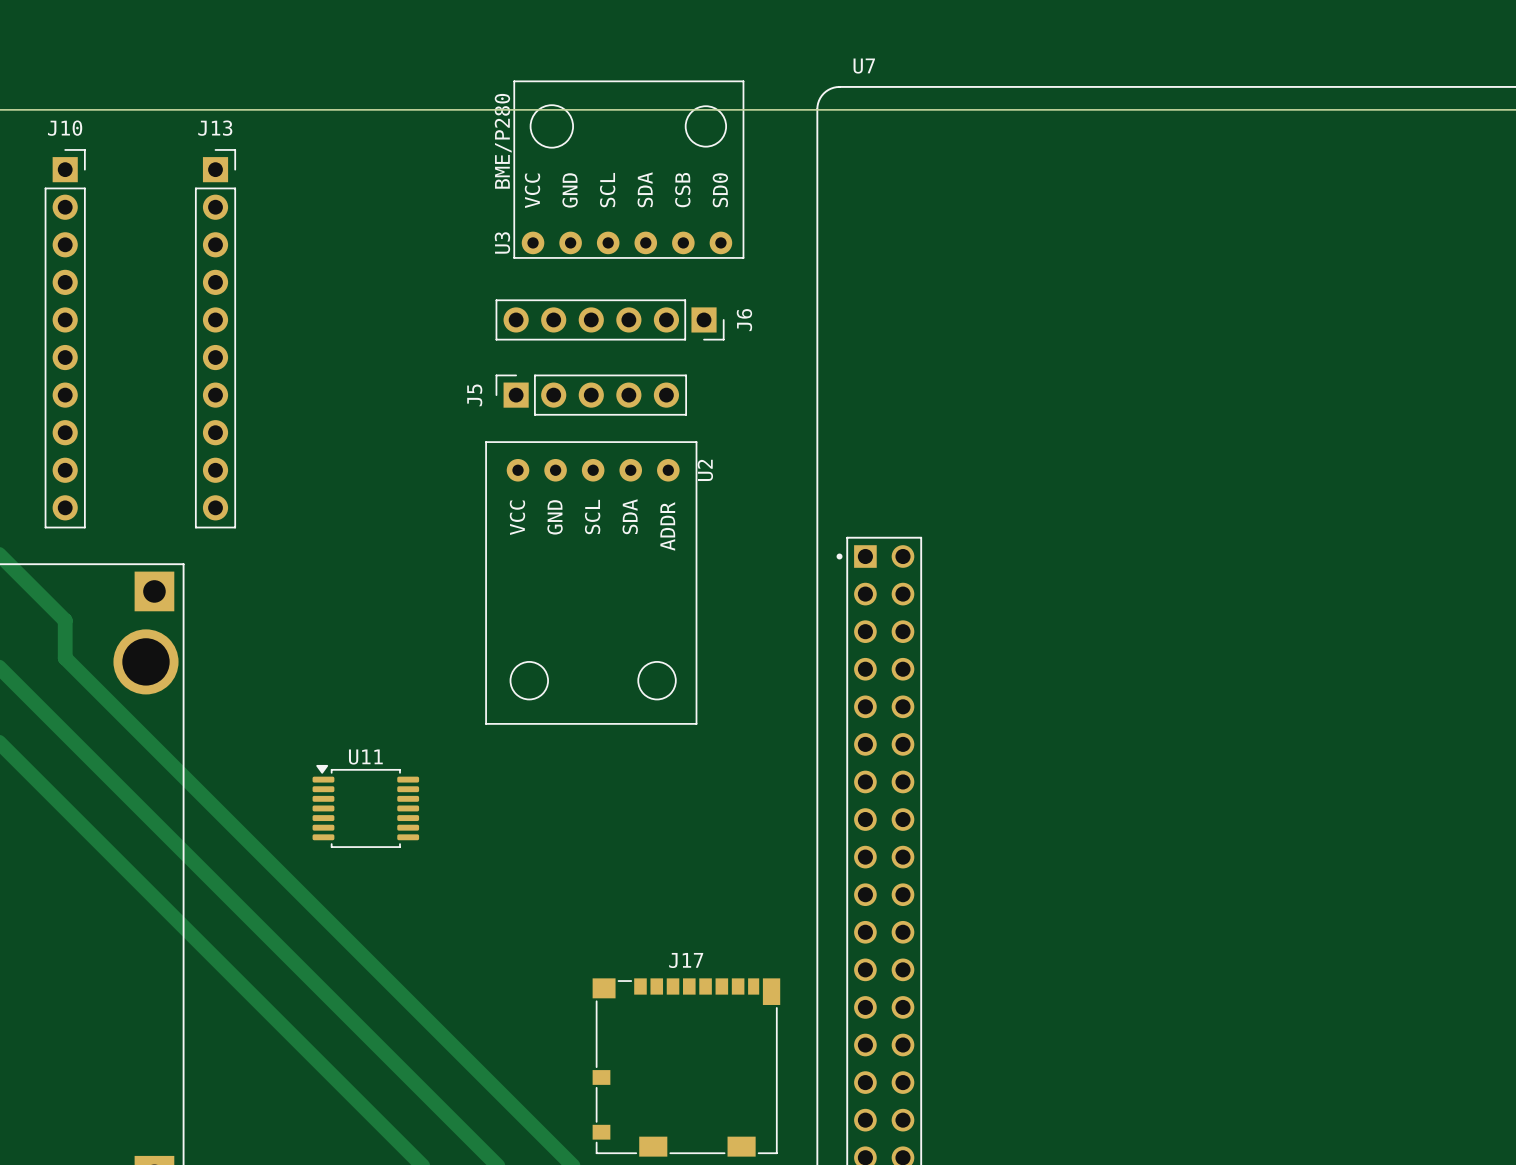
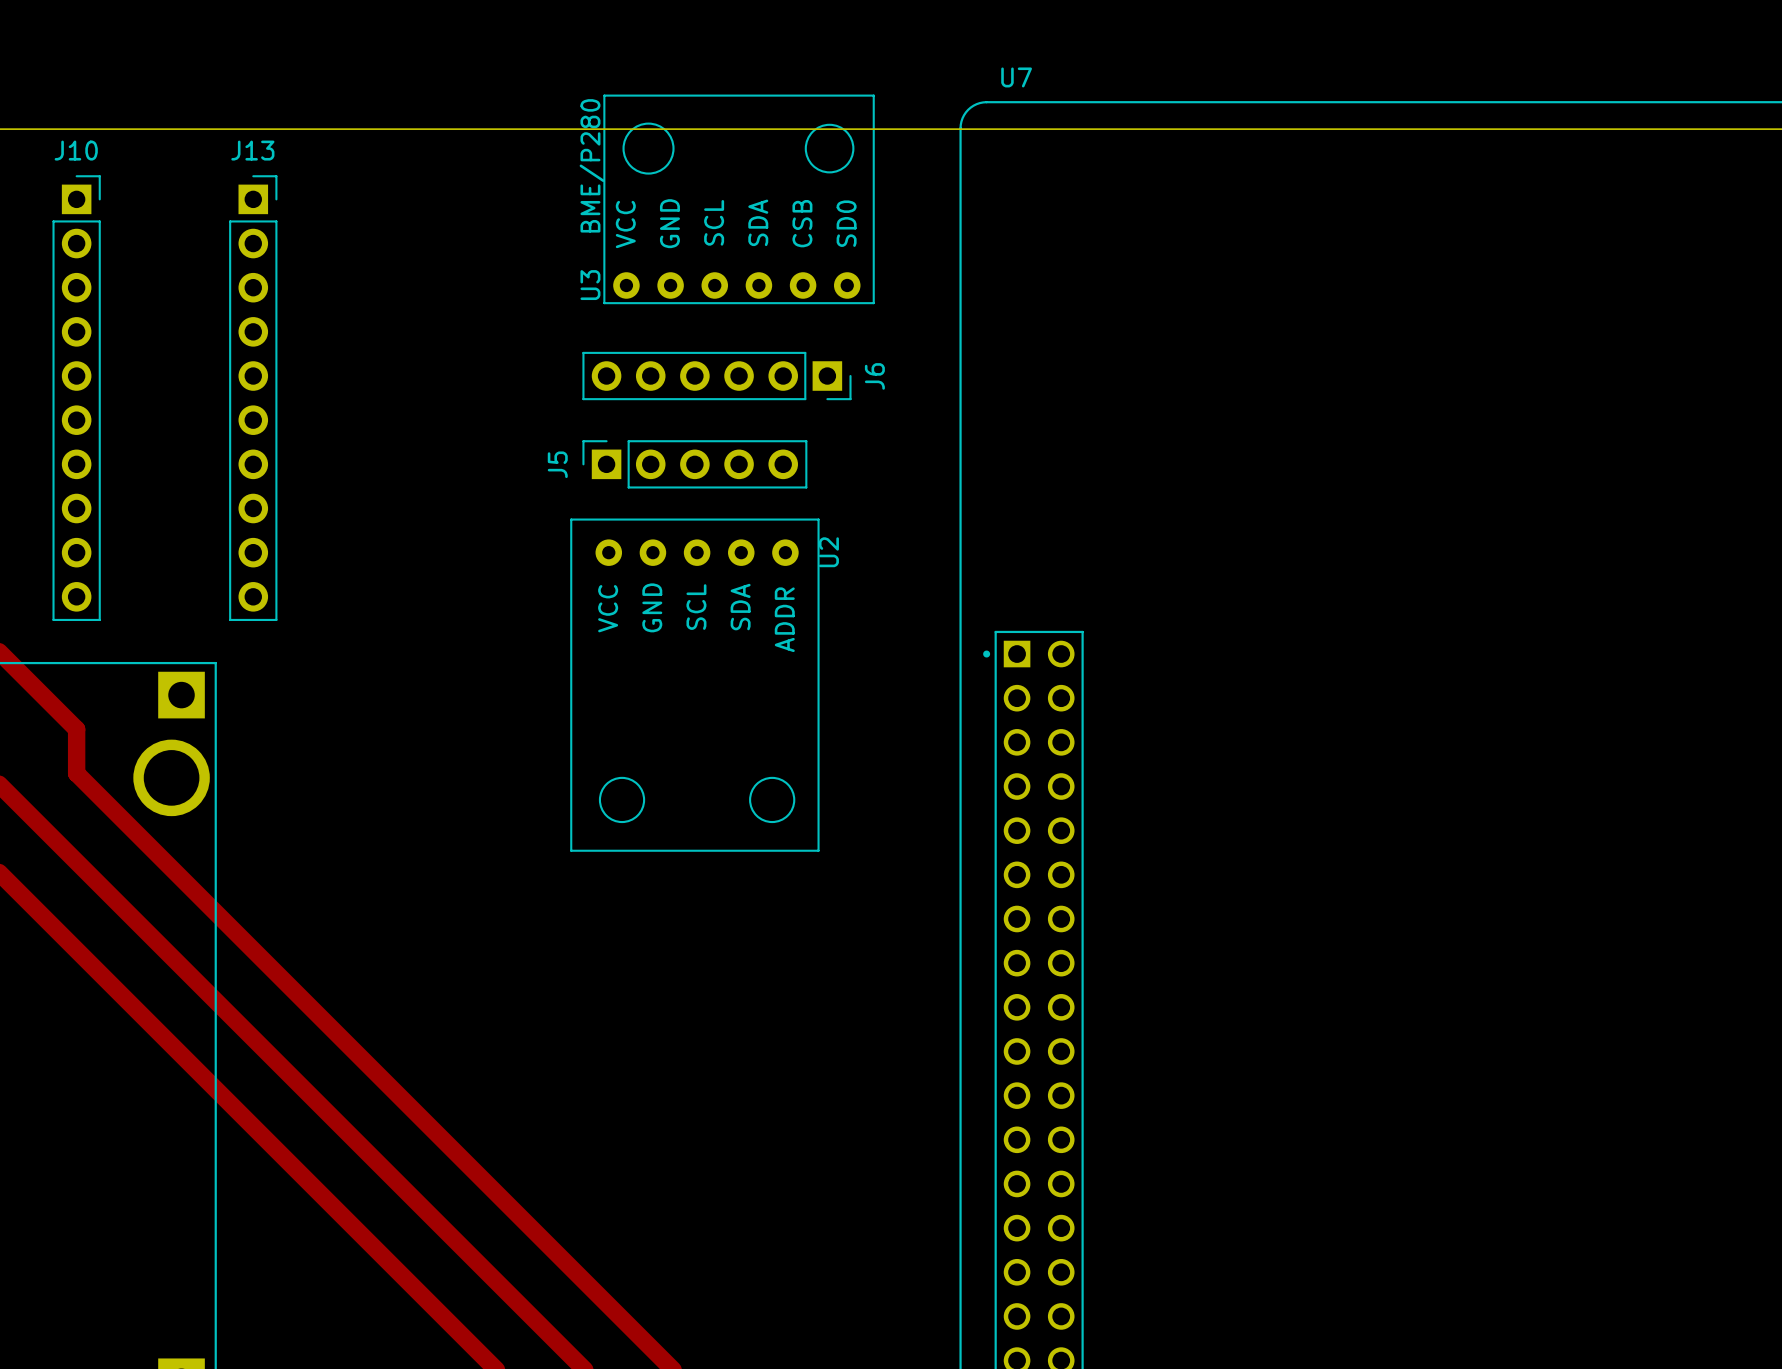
U11: (365, 806) -> none
J17: (686, 1067) -> none

